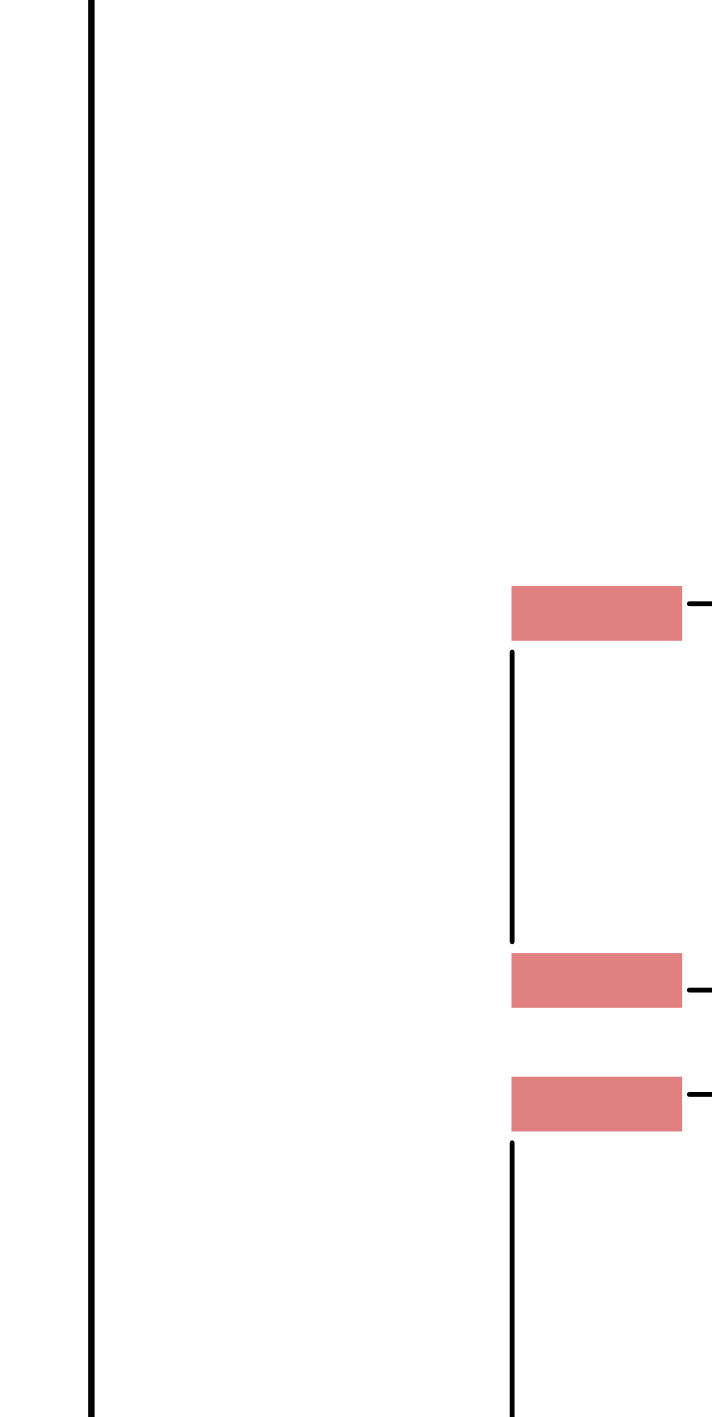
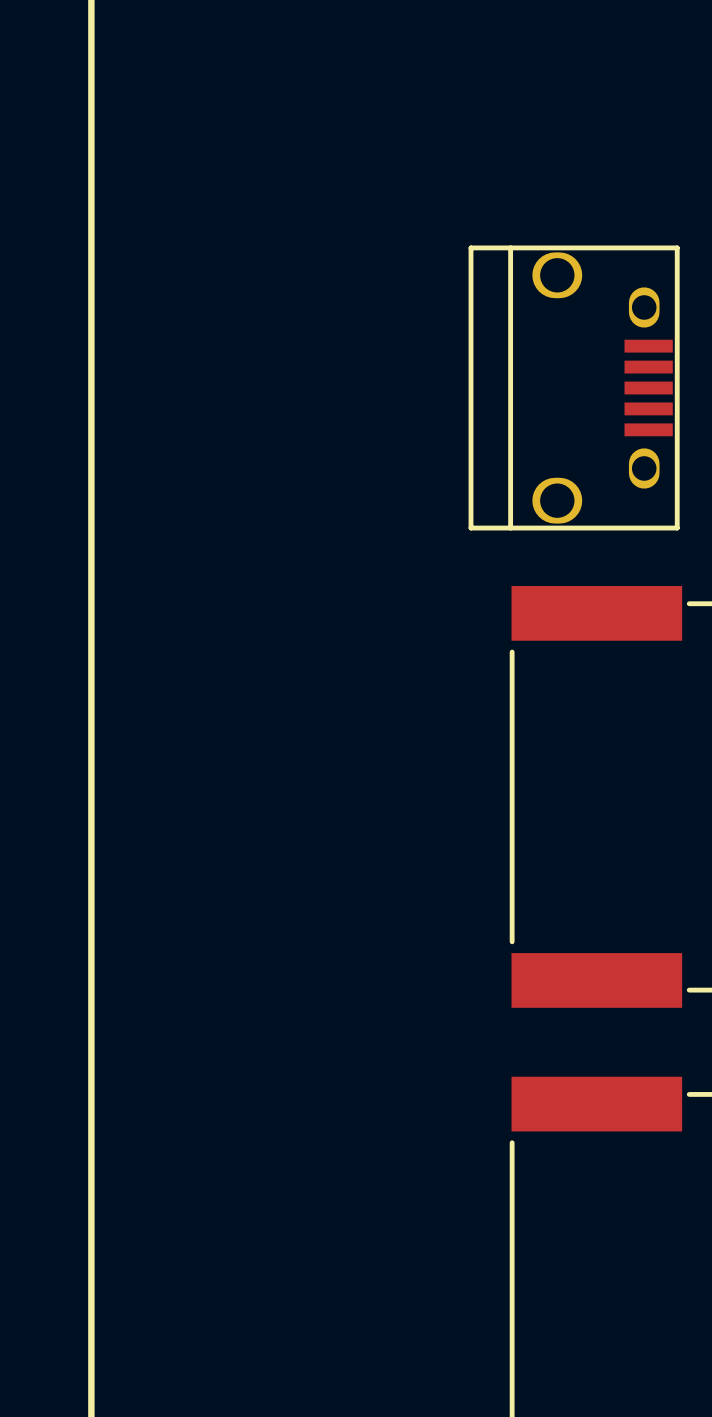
part: none -> (574, 387)

